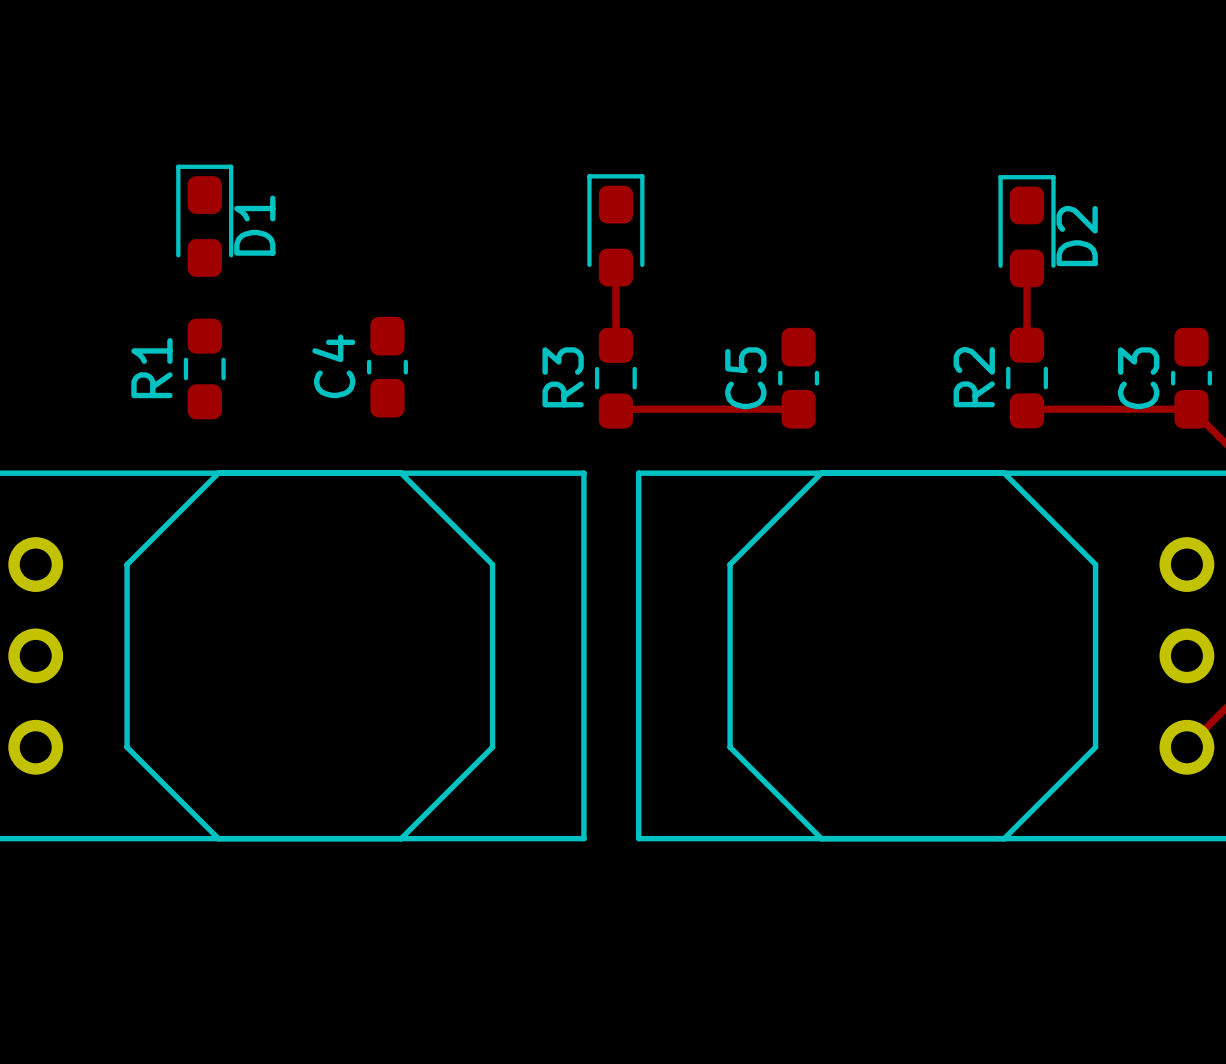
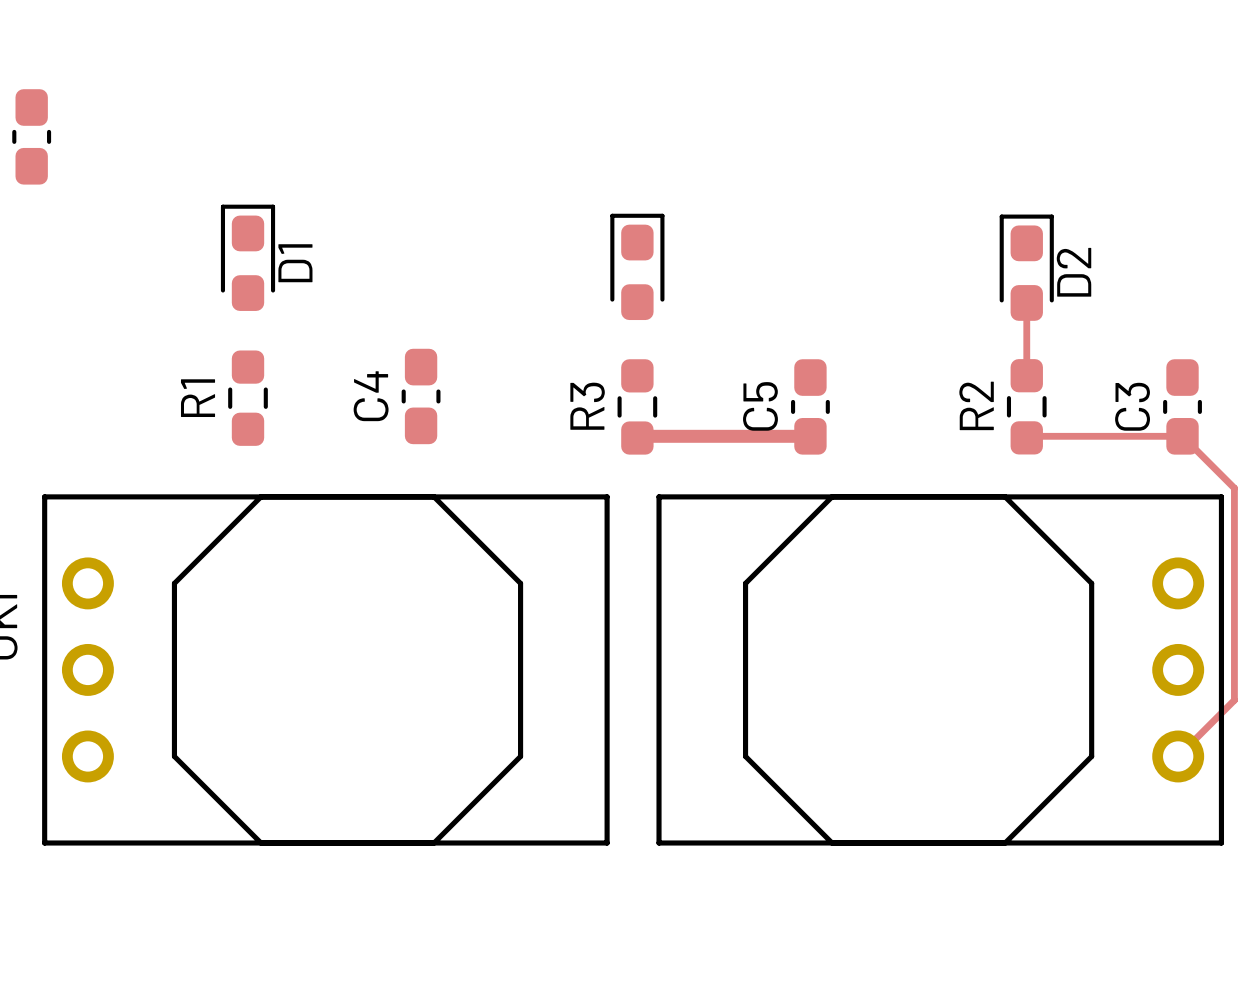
track: (615, 267) (615, 345) -> none
track width: thin (798, 409) (617, 409) (615, 411) -> thick (810, 436) (639, 436) (637, 438)

